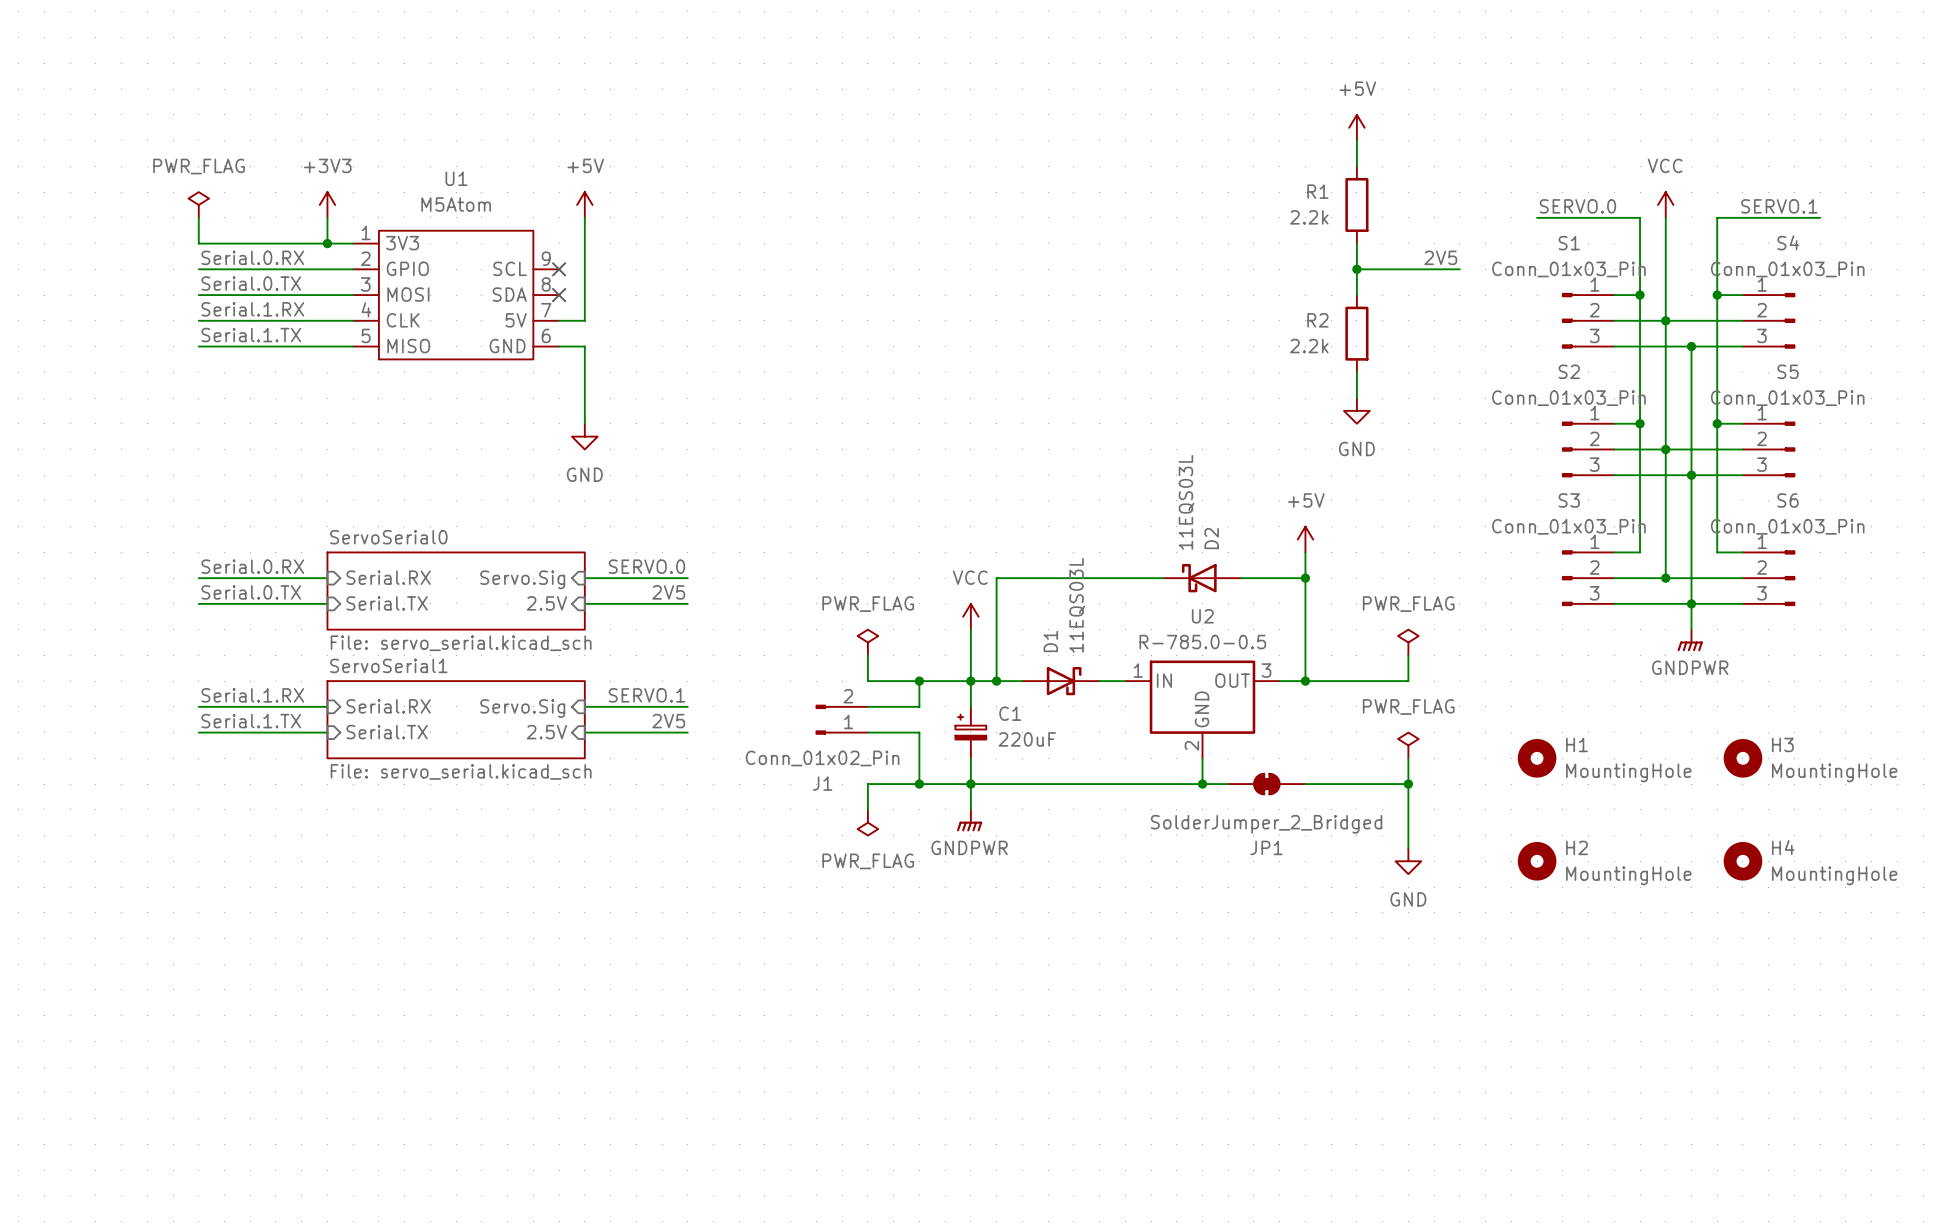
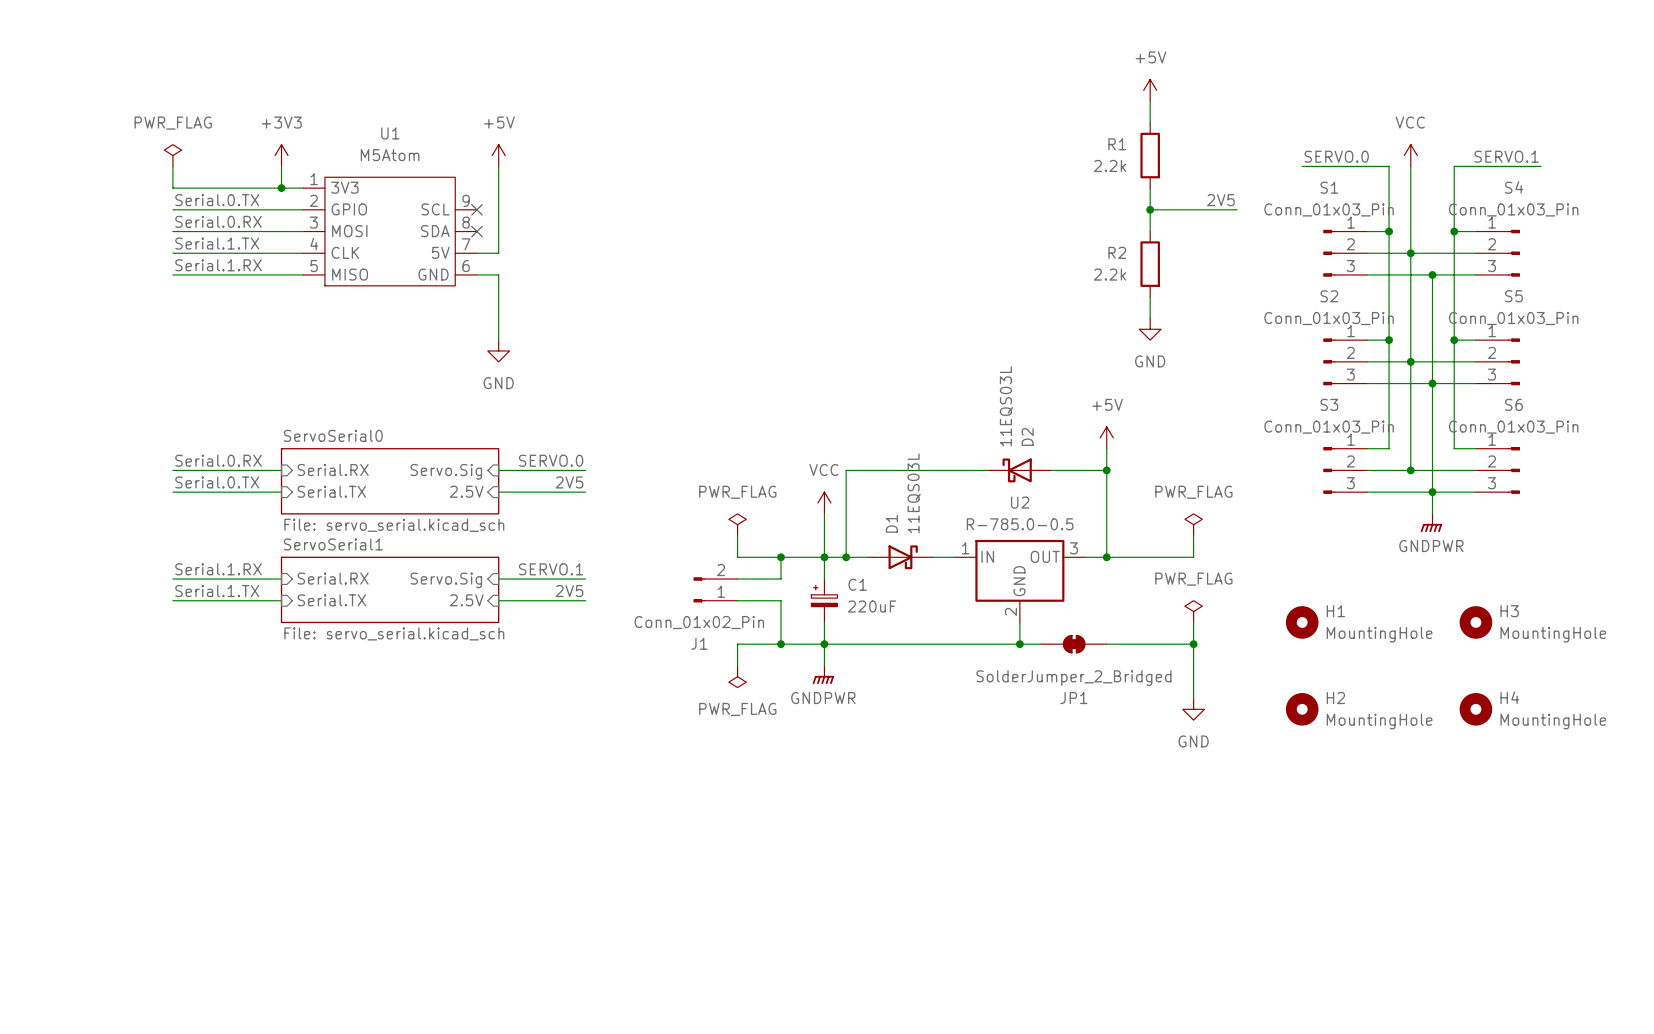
label: Serial.0.RX (252, 257) -> Serial.0.TX (217, 200)
label: Serial.0.TX (251, 283) -> Serial.0.RX (218, 221)
label: Serial.1.RX (252, 309) -> Serial.1.TX (217, 243)
label: Serial.1.TX (251, 335) -> Serial.1.RX (218, 265)

